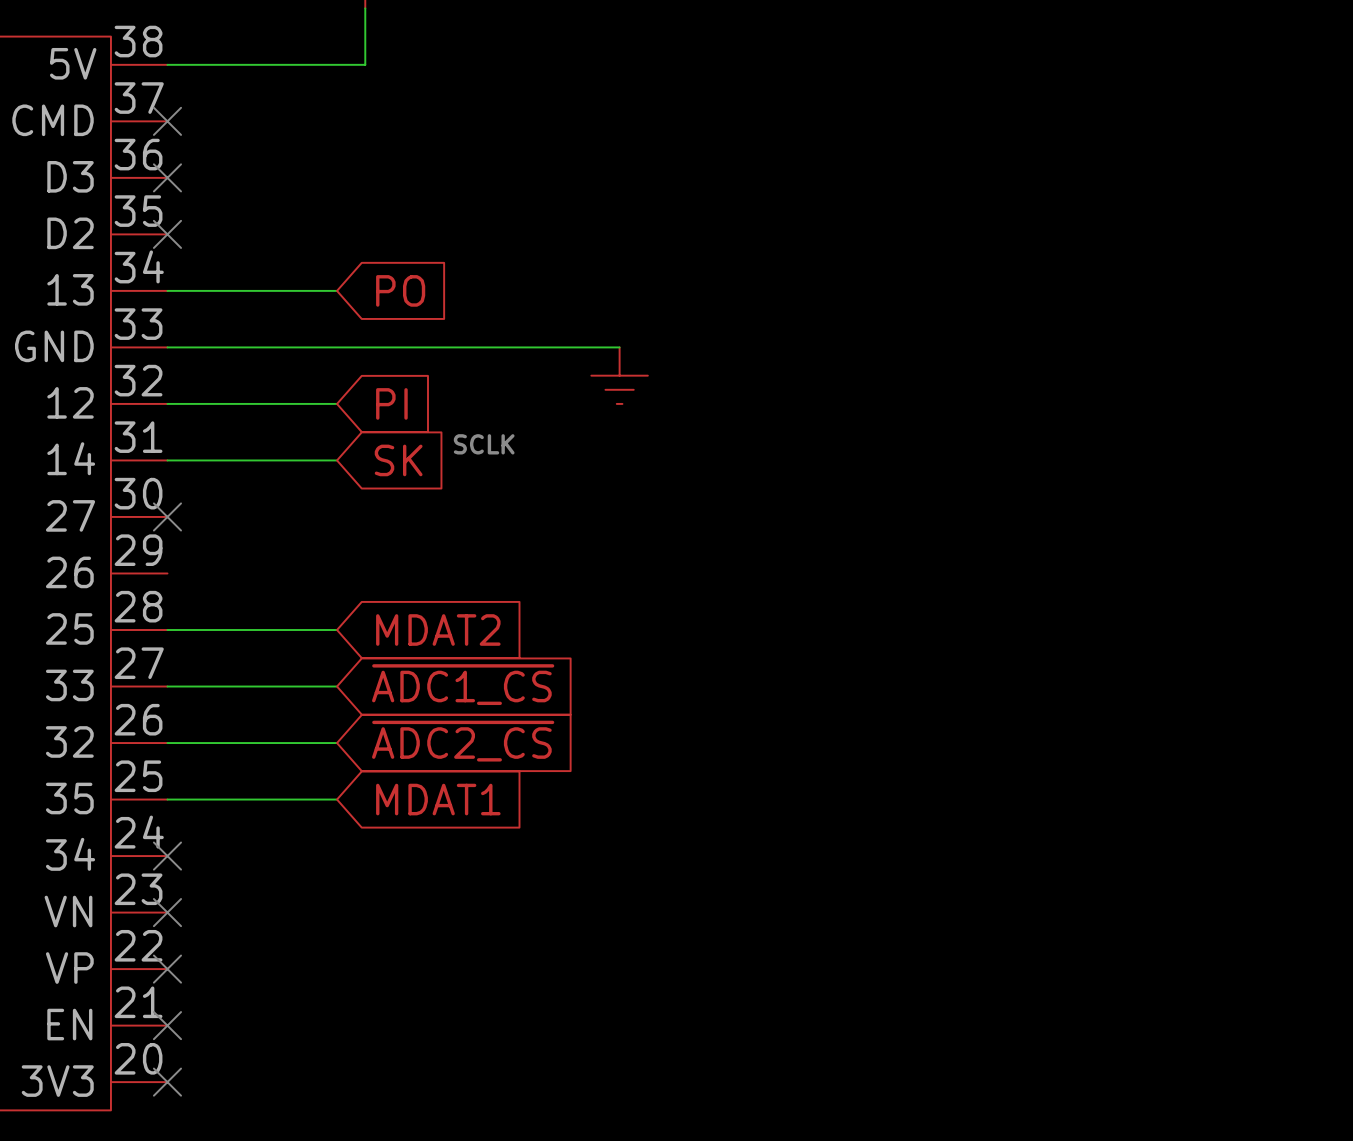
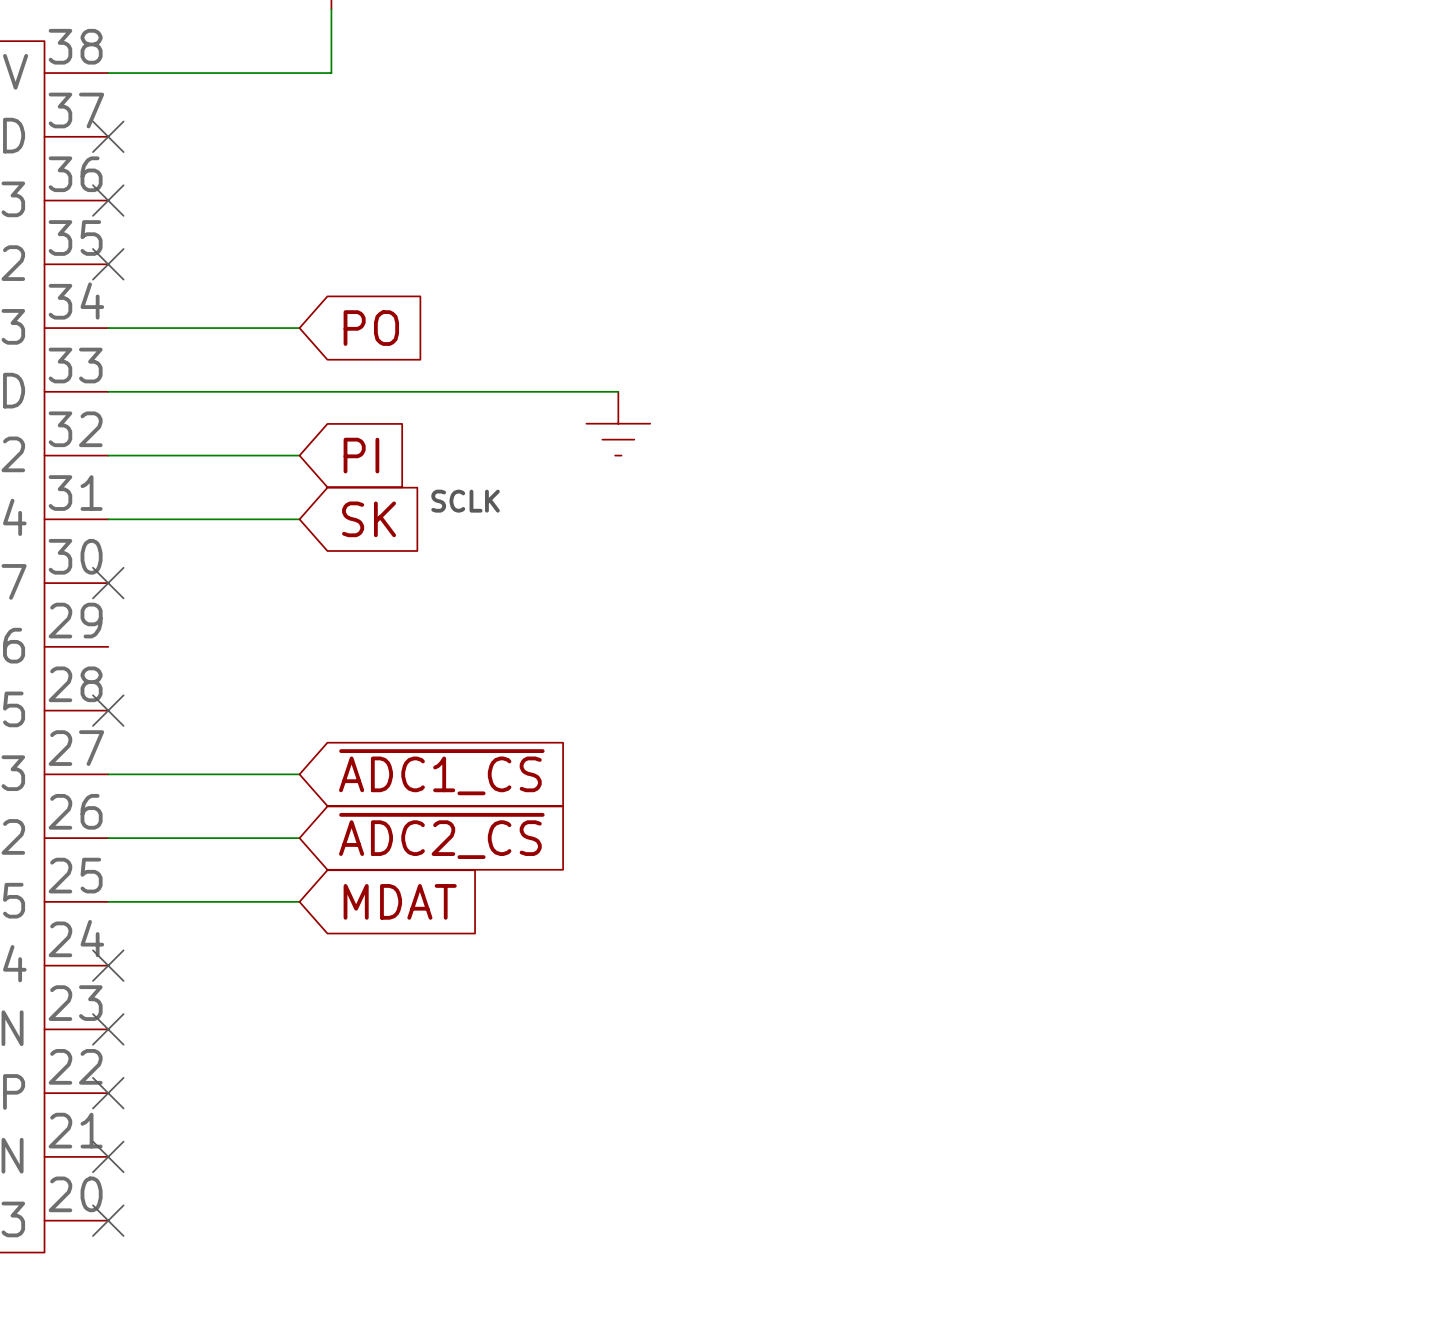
wire: (167, 630) (337, 630) -> none
no-connect mark: none -> (108, 710)
global label: MDAT2 (438, 630) -> none
global label: MDAT1 (438, 799) -> MDAT (400, 901)

